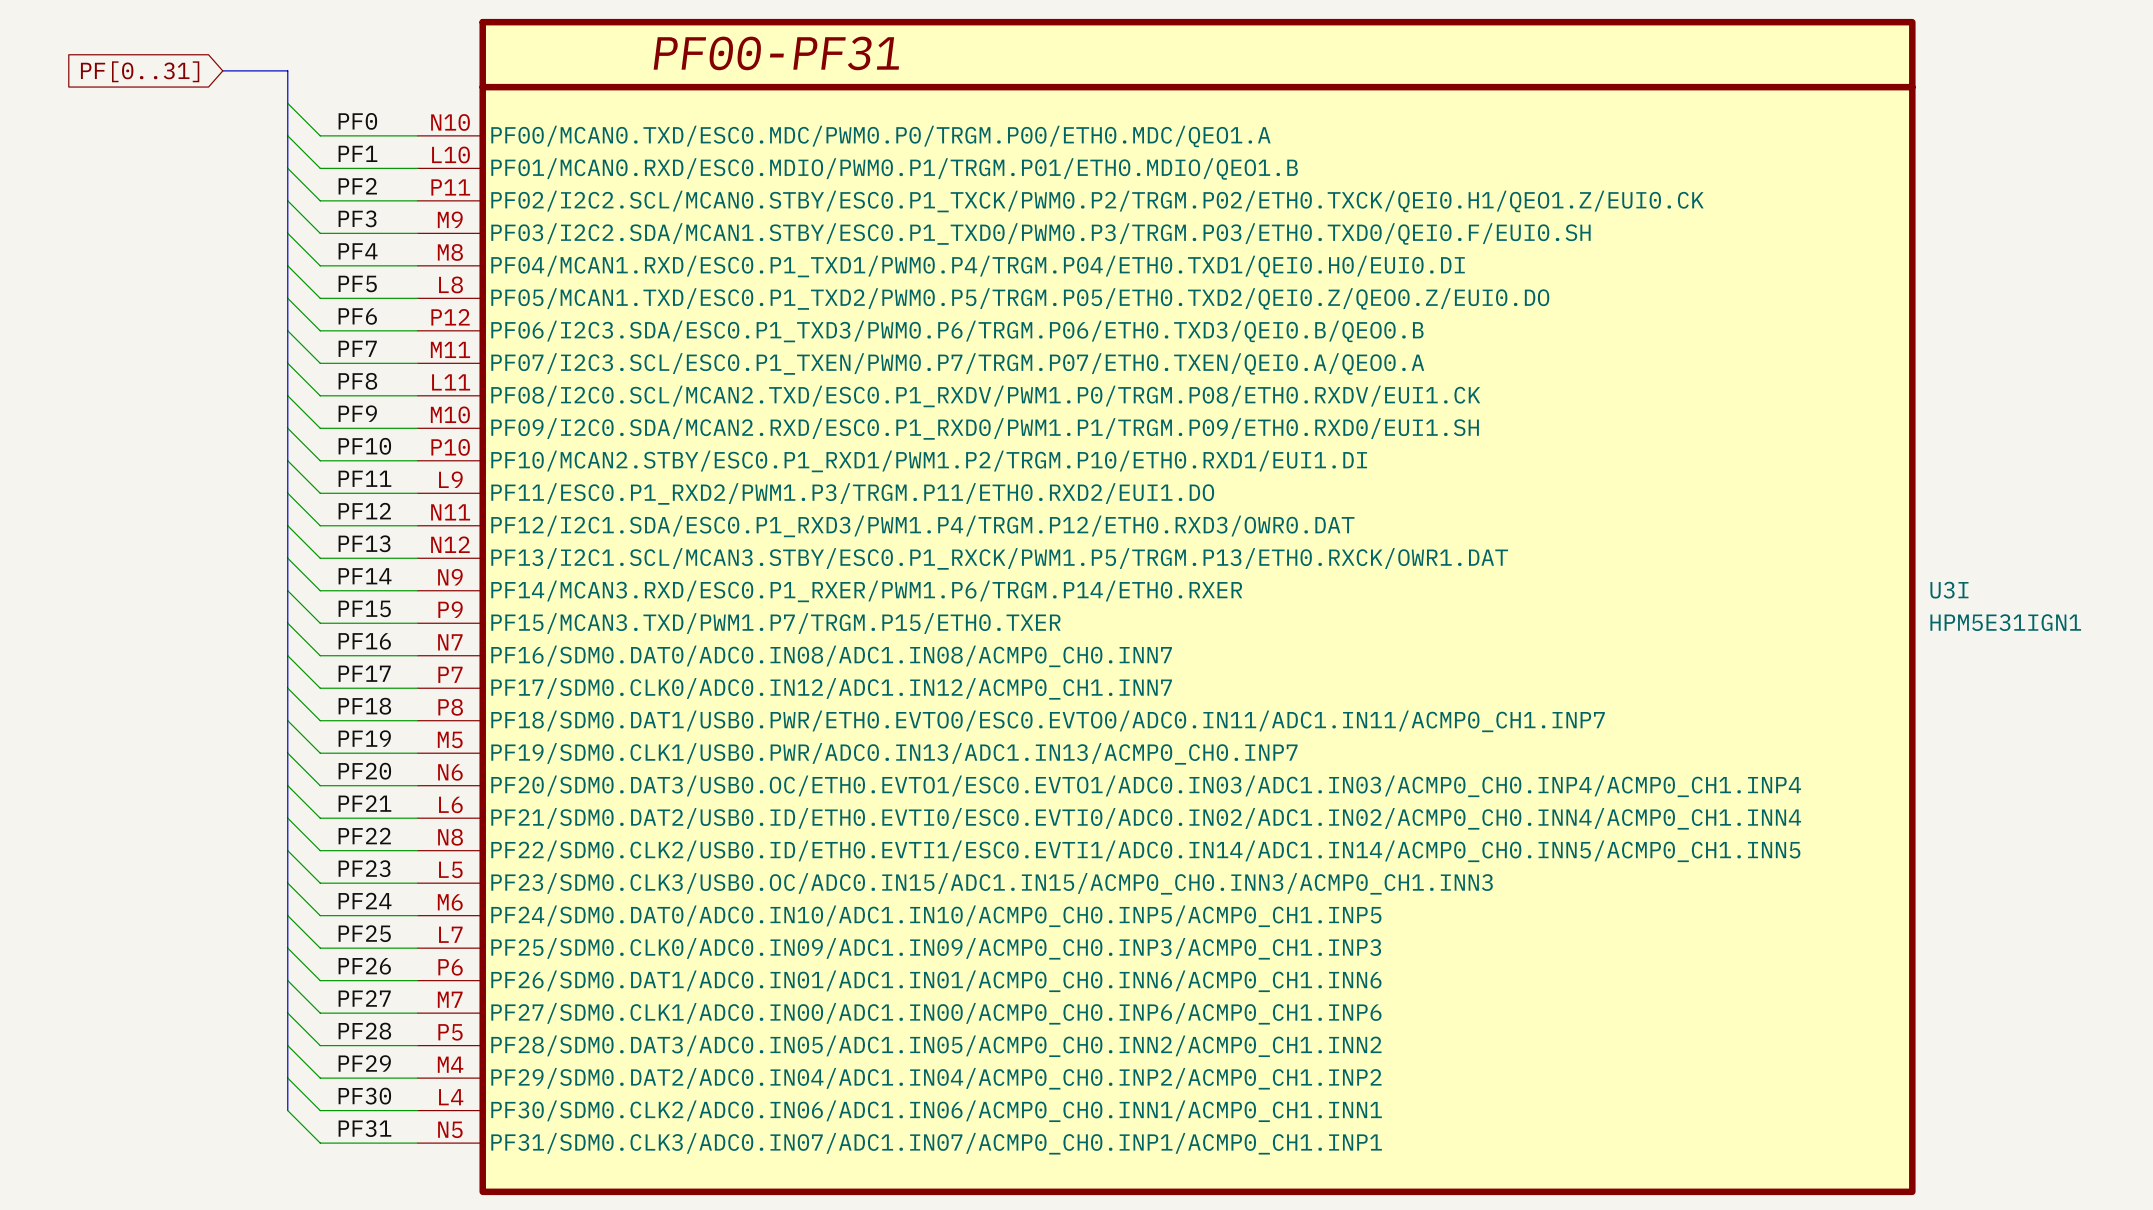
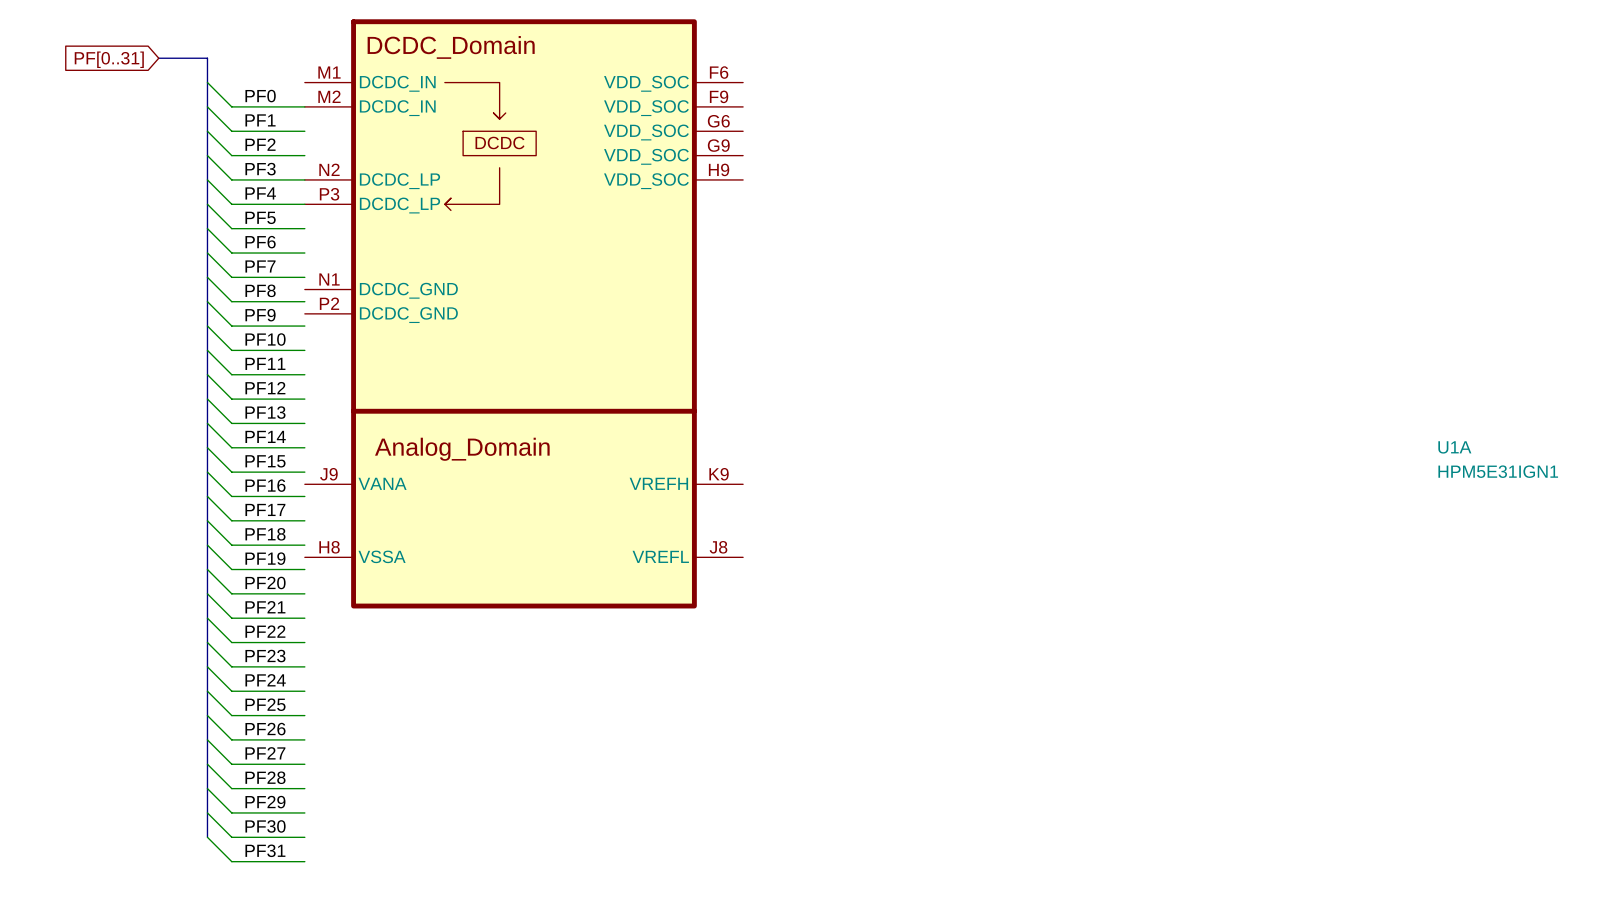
U1A: none -> HPM5E31IGN1 (523, 313)
U3I: HPM5E31IGN1 (1166, 607) -> none

